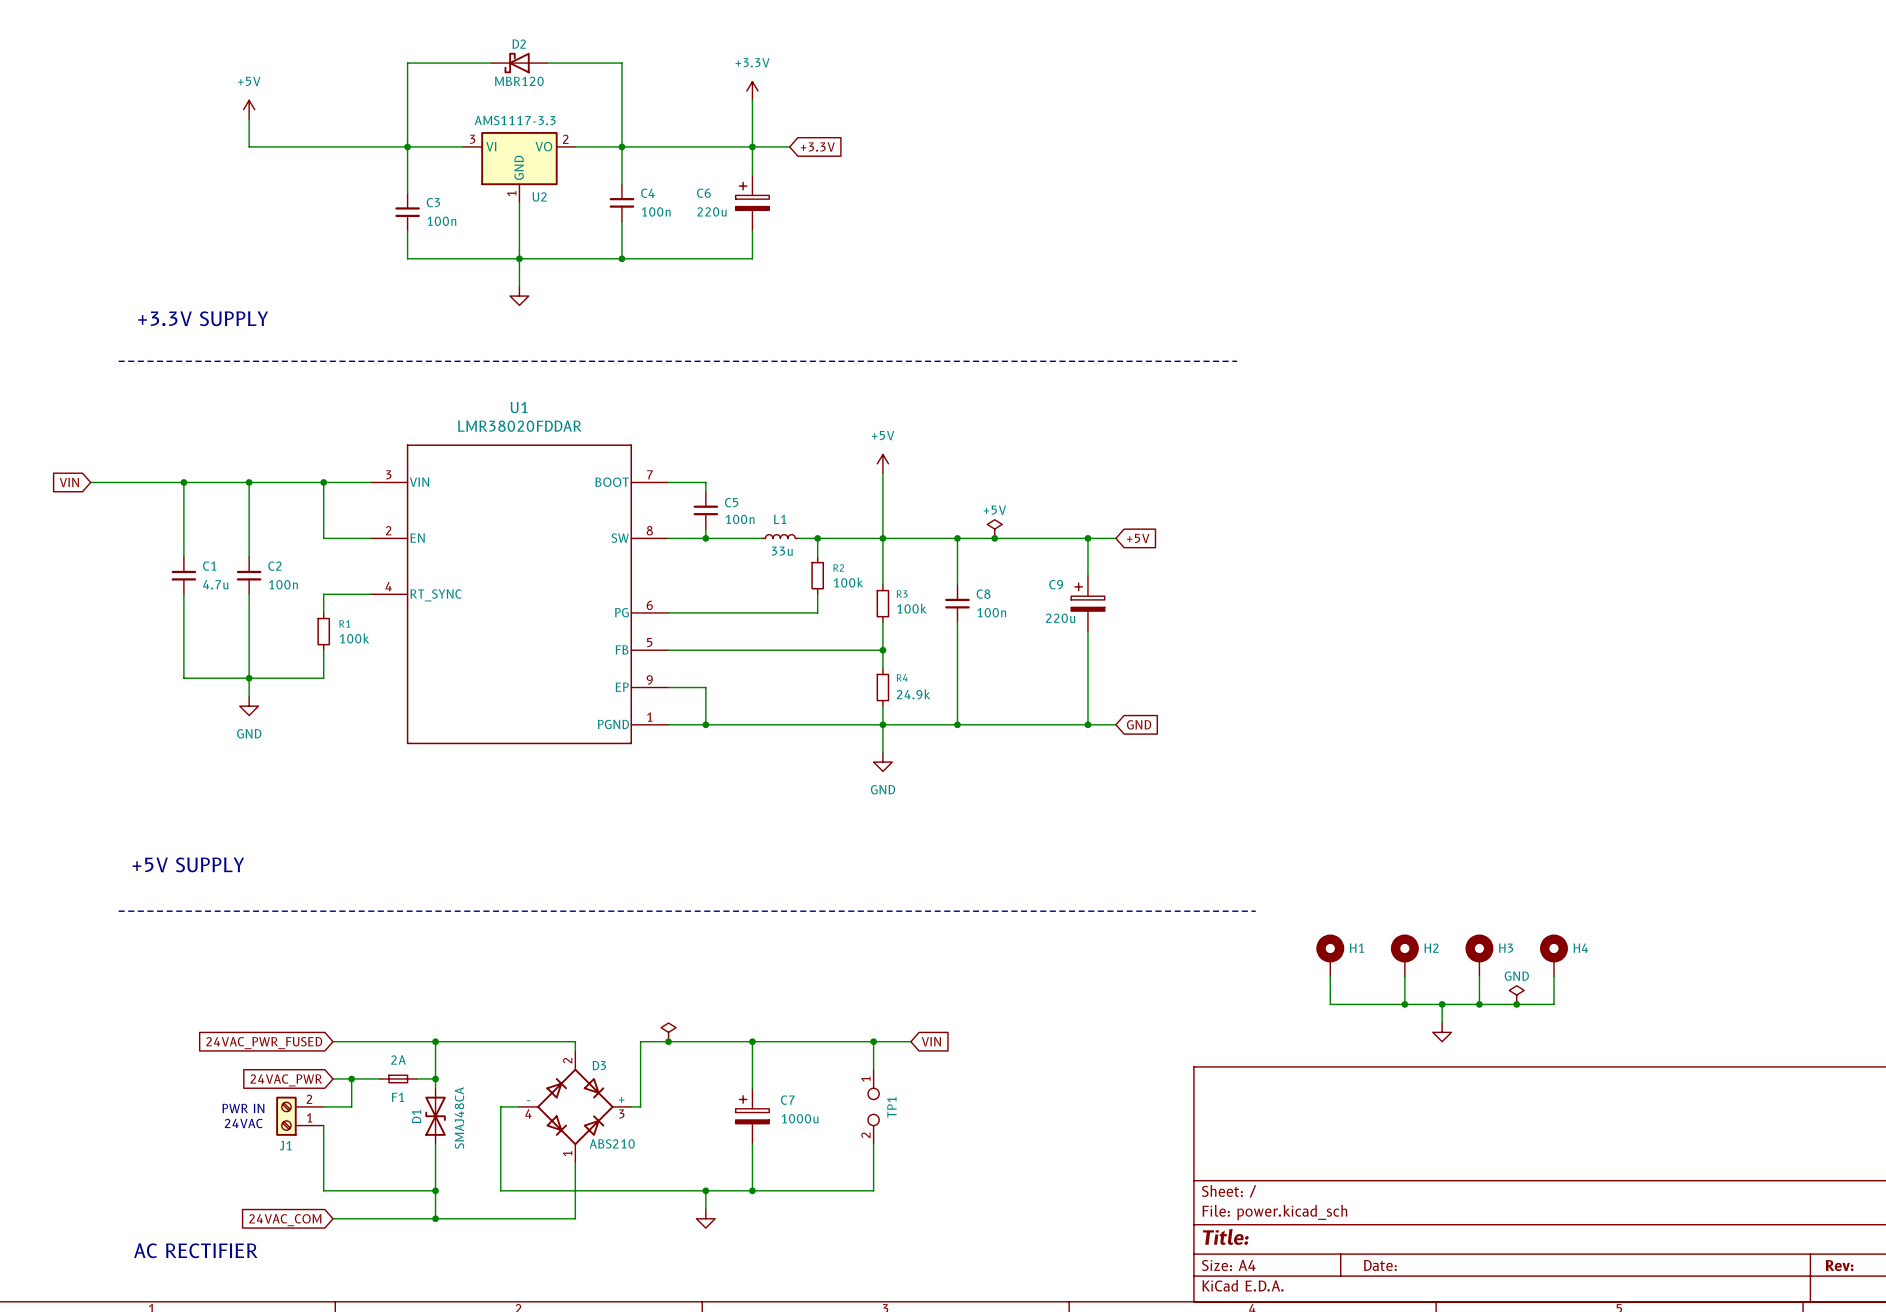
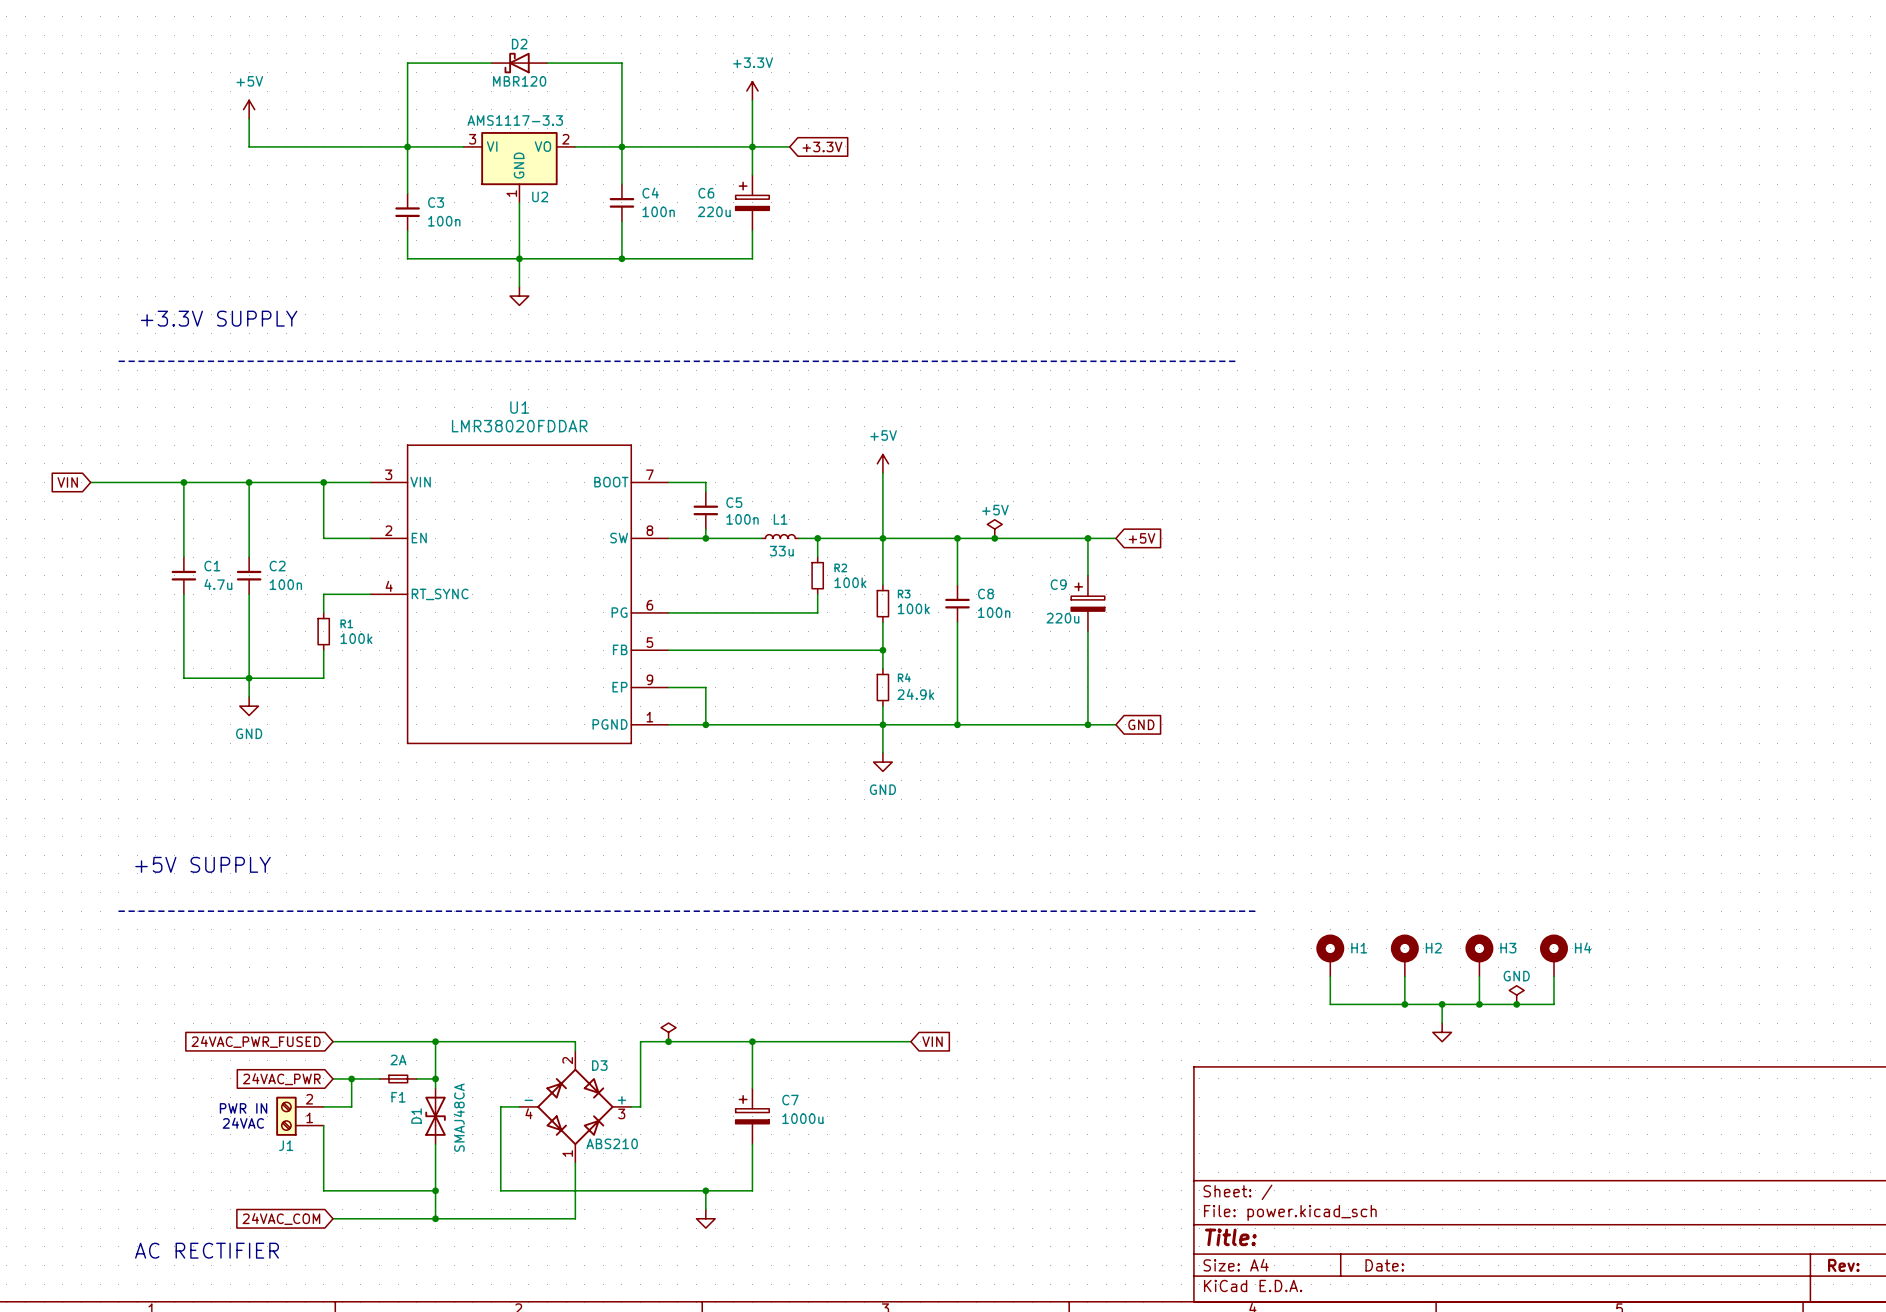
wire: (873, 1041) (873, 1069) -> none
junction: (873, 1041) -> none
TP1: (873, 1106) -> none
wire: (873, 1144) (873, 1190) (752, 1190) -> none
junction: (752, 1190) -> none

